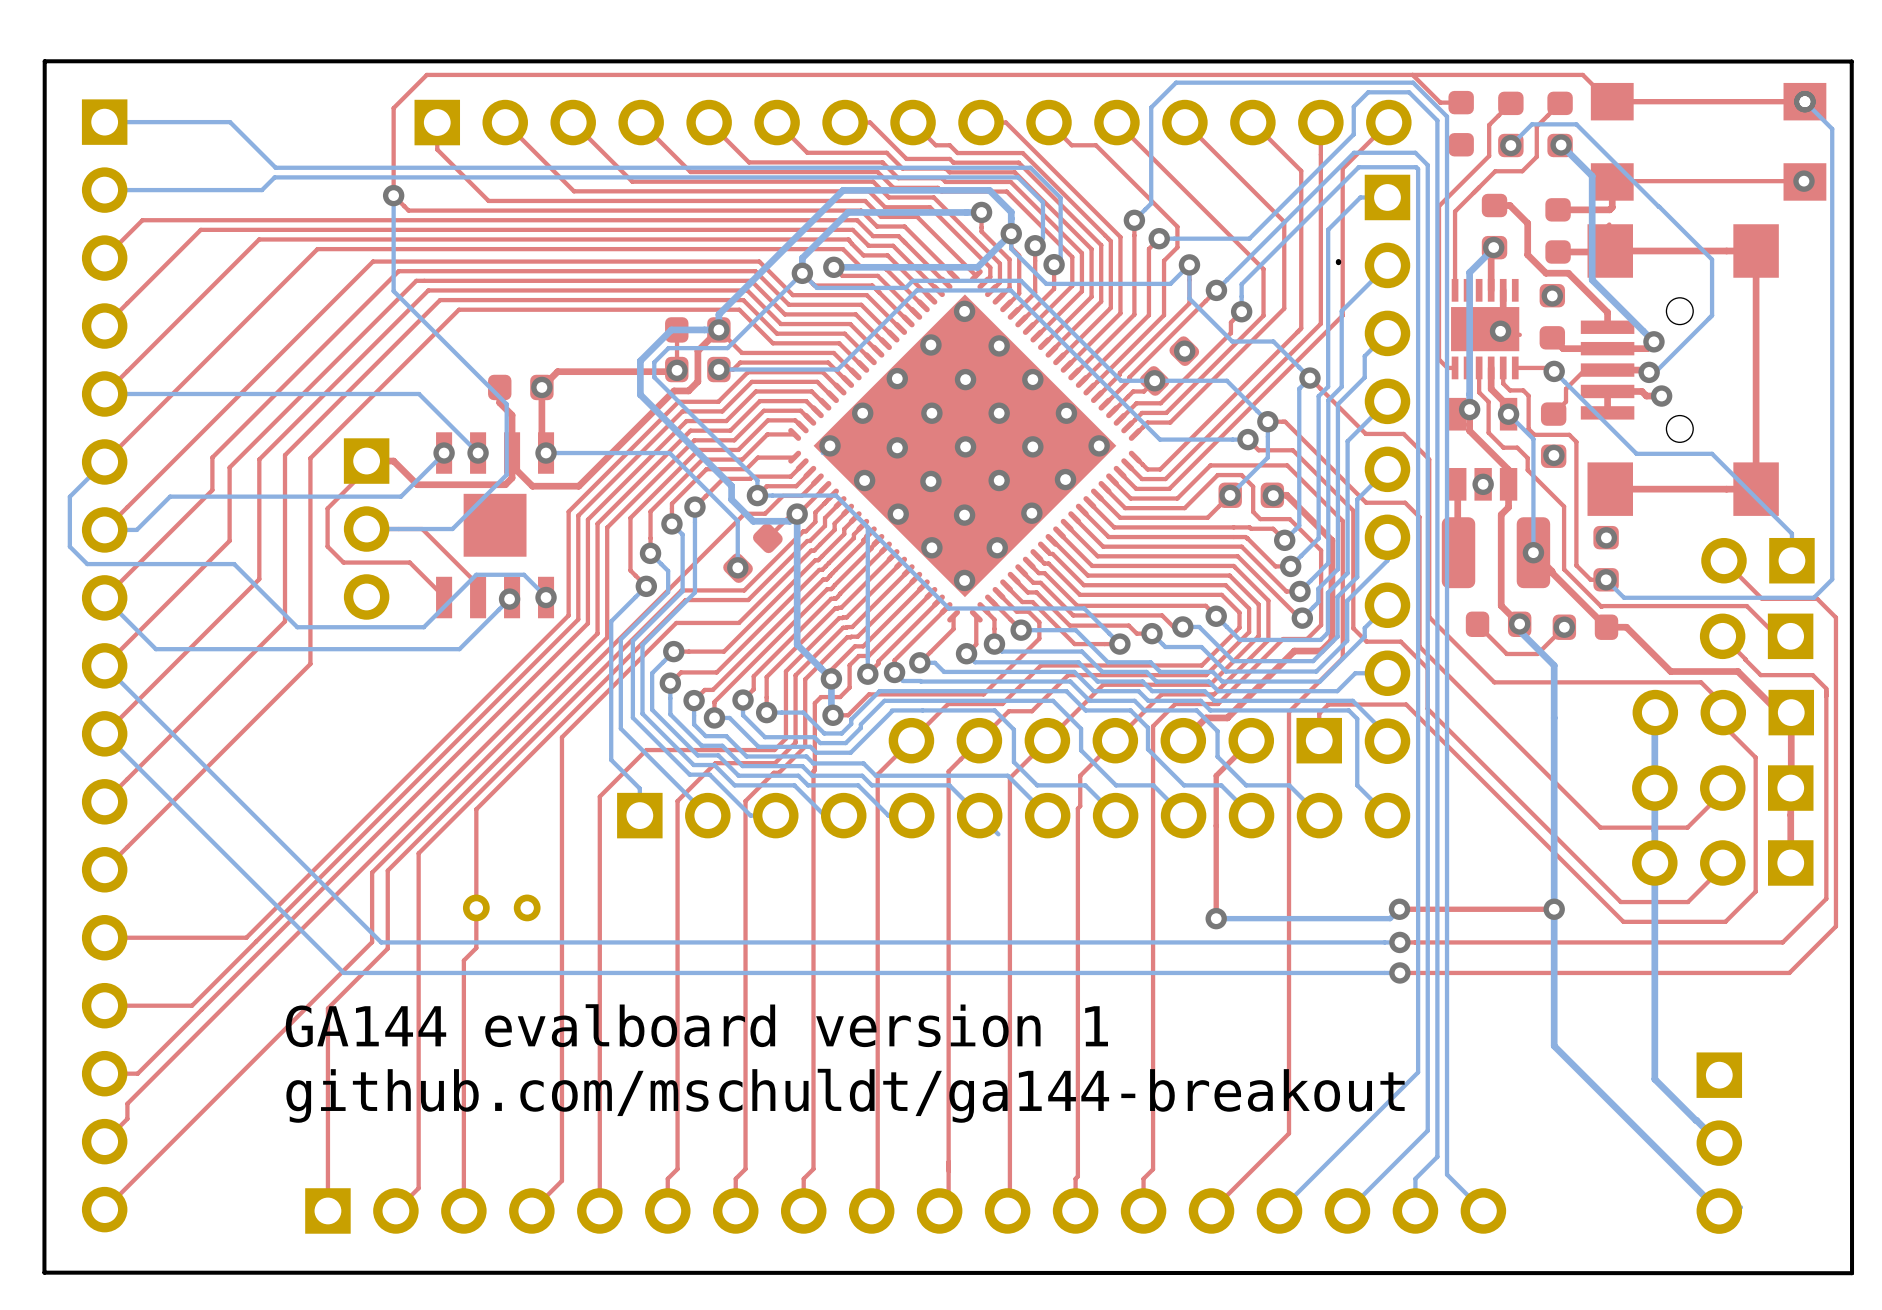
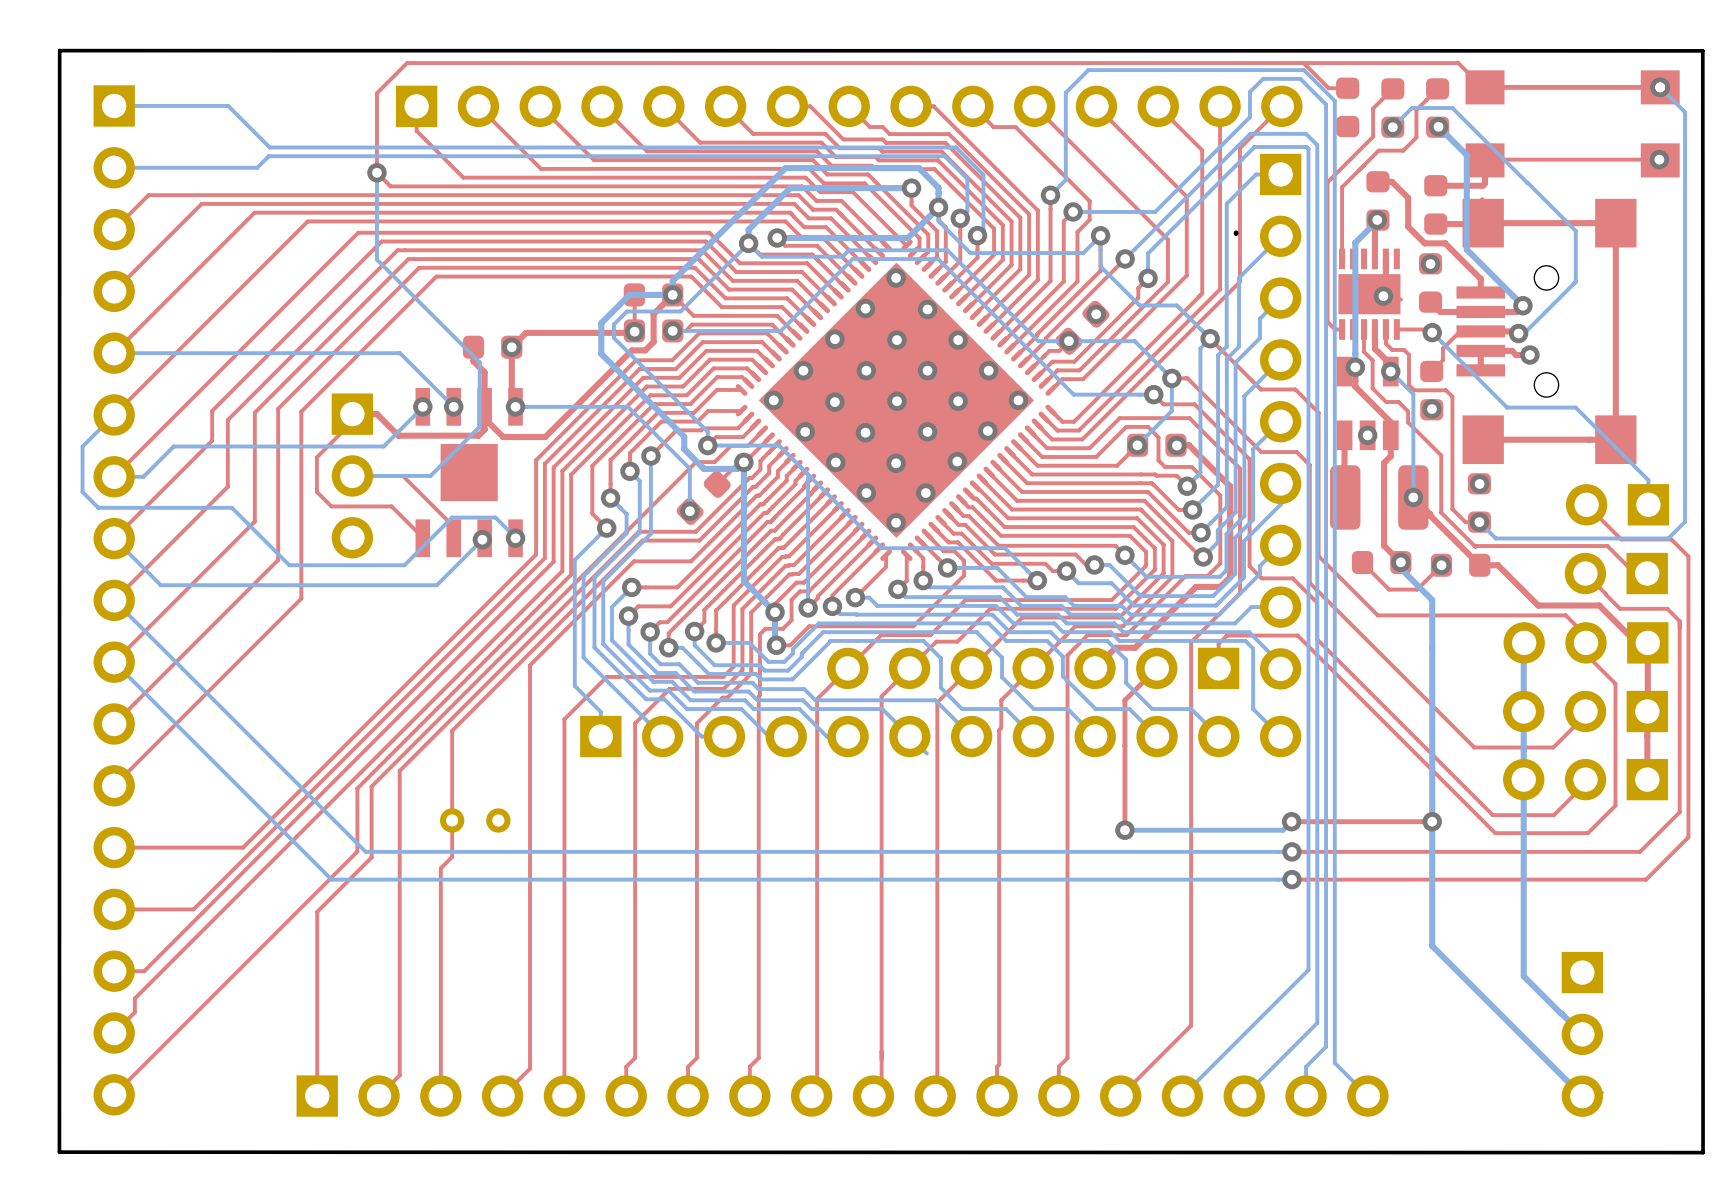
text: GA144 evalboard version 1 (696, 1025) -> none
text: github.com/mschuldt/ga144-breakout (845, 1095) -> none

